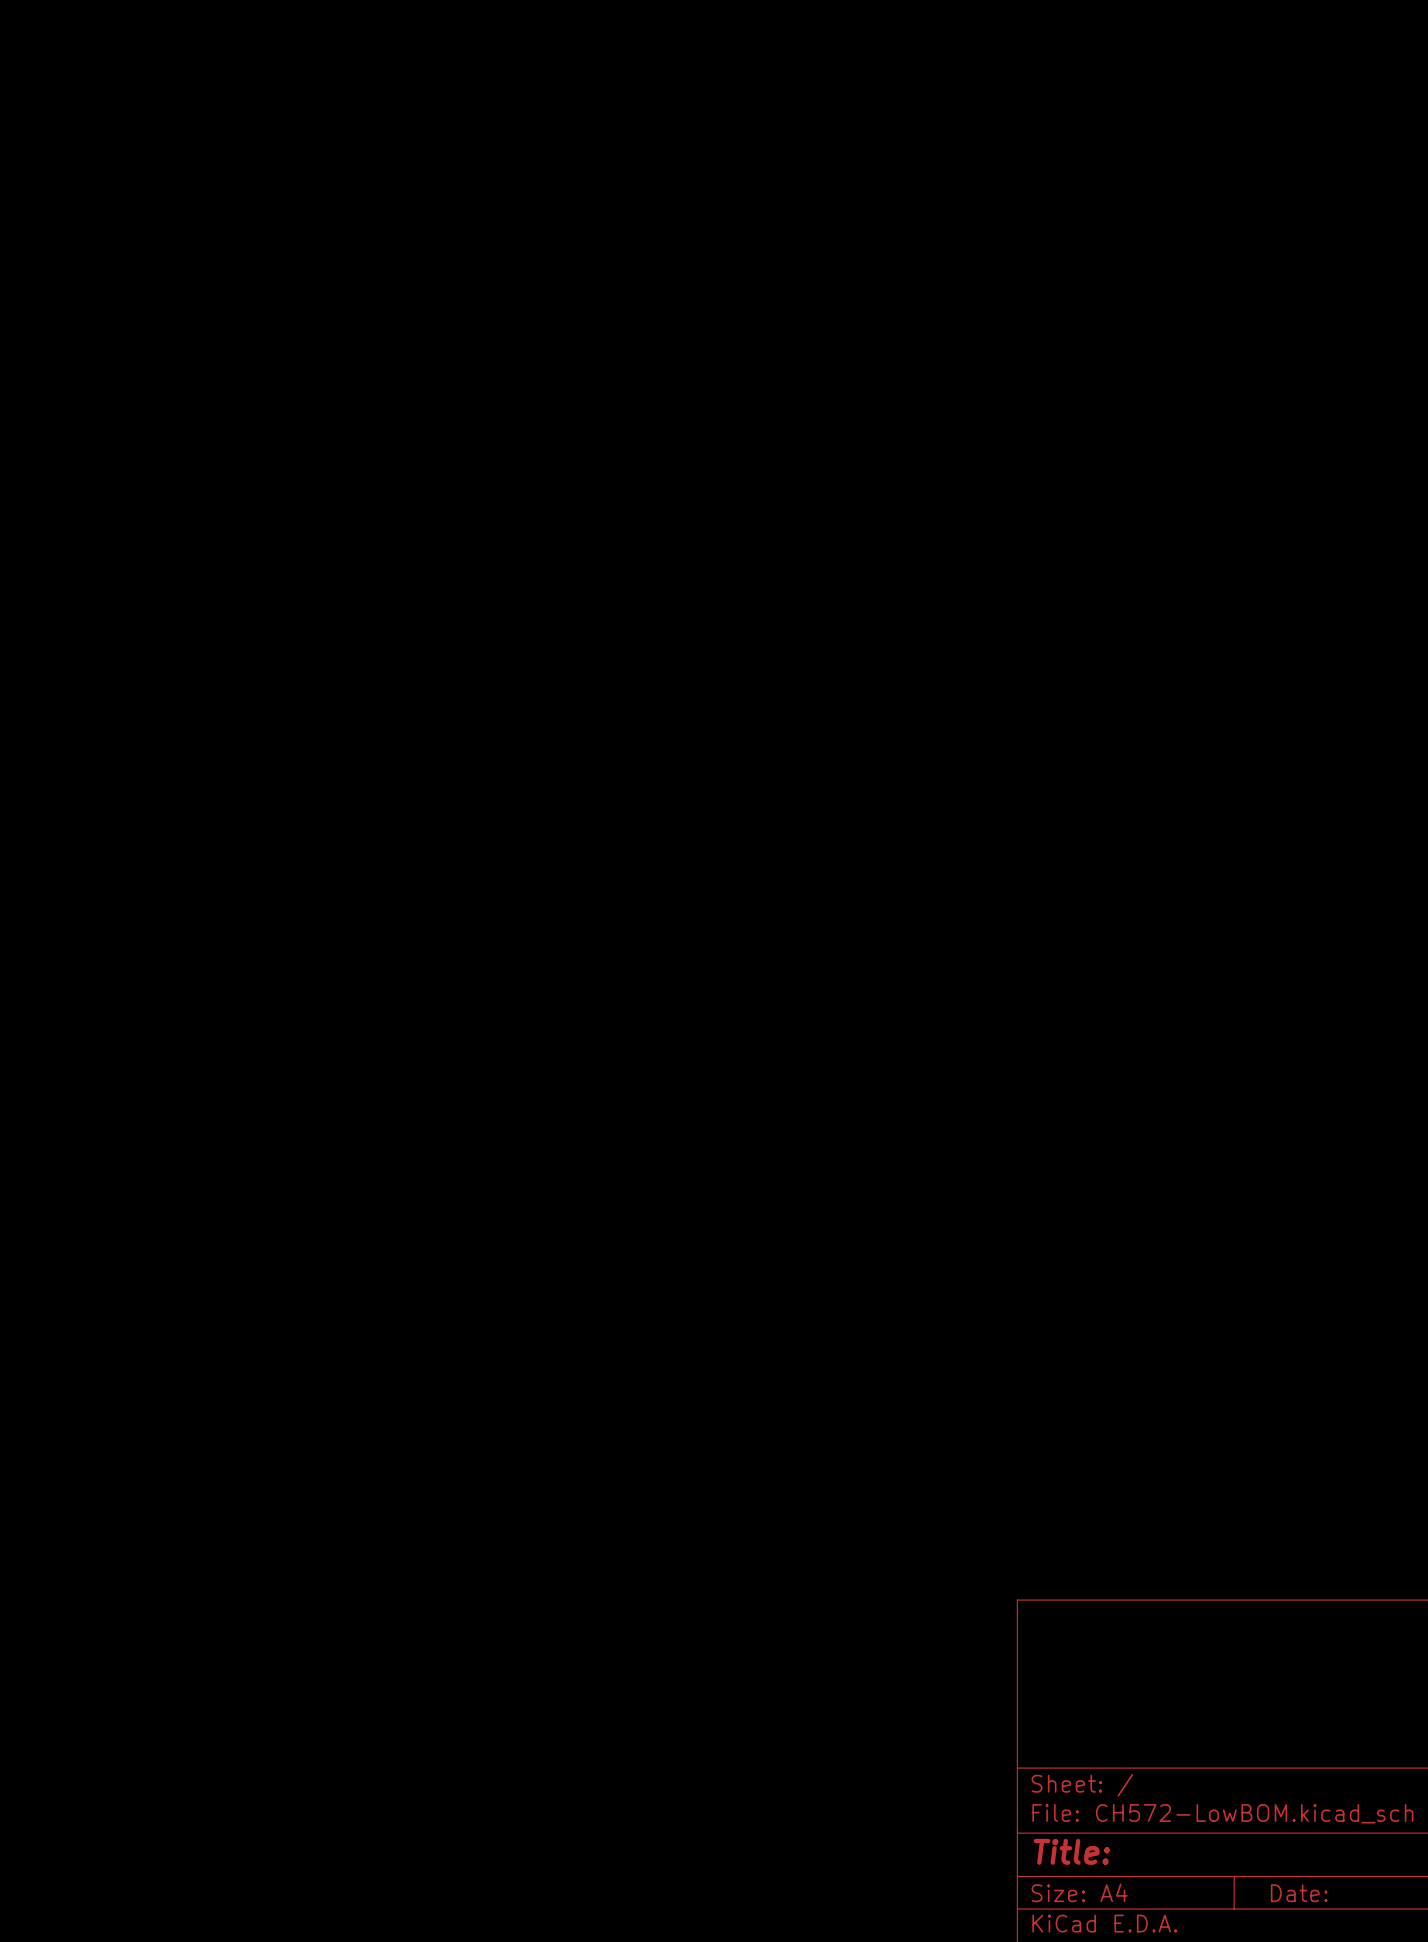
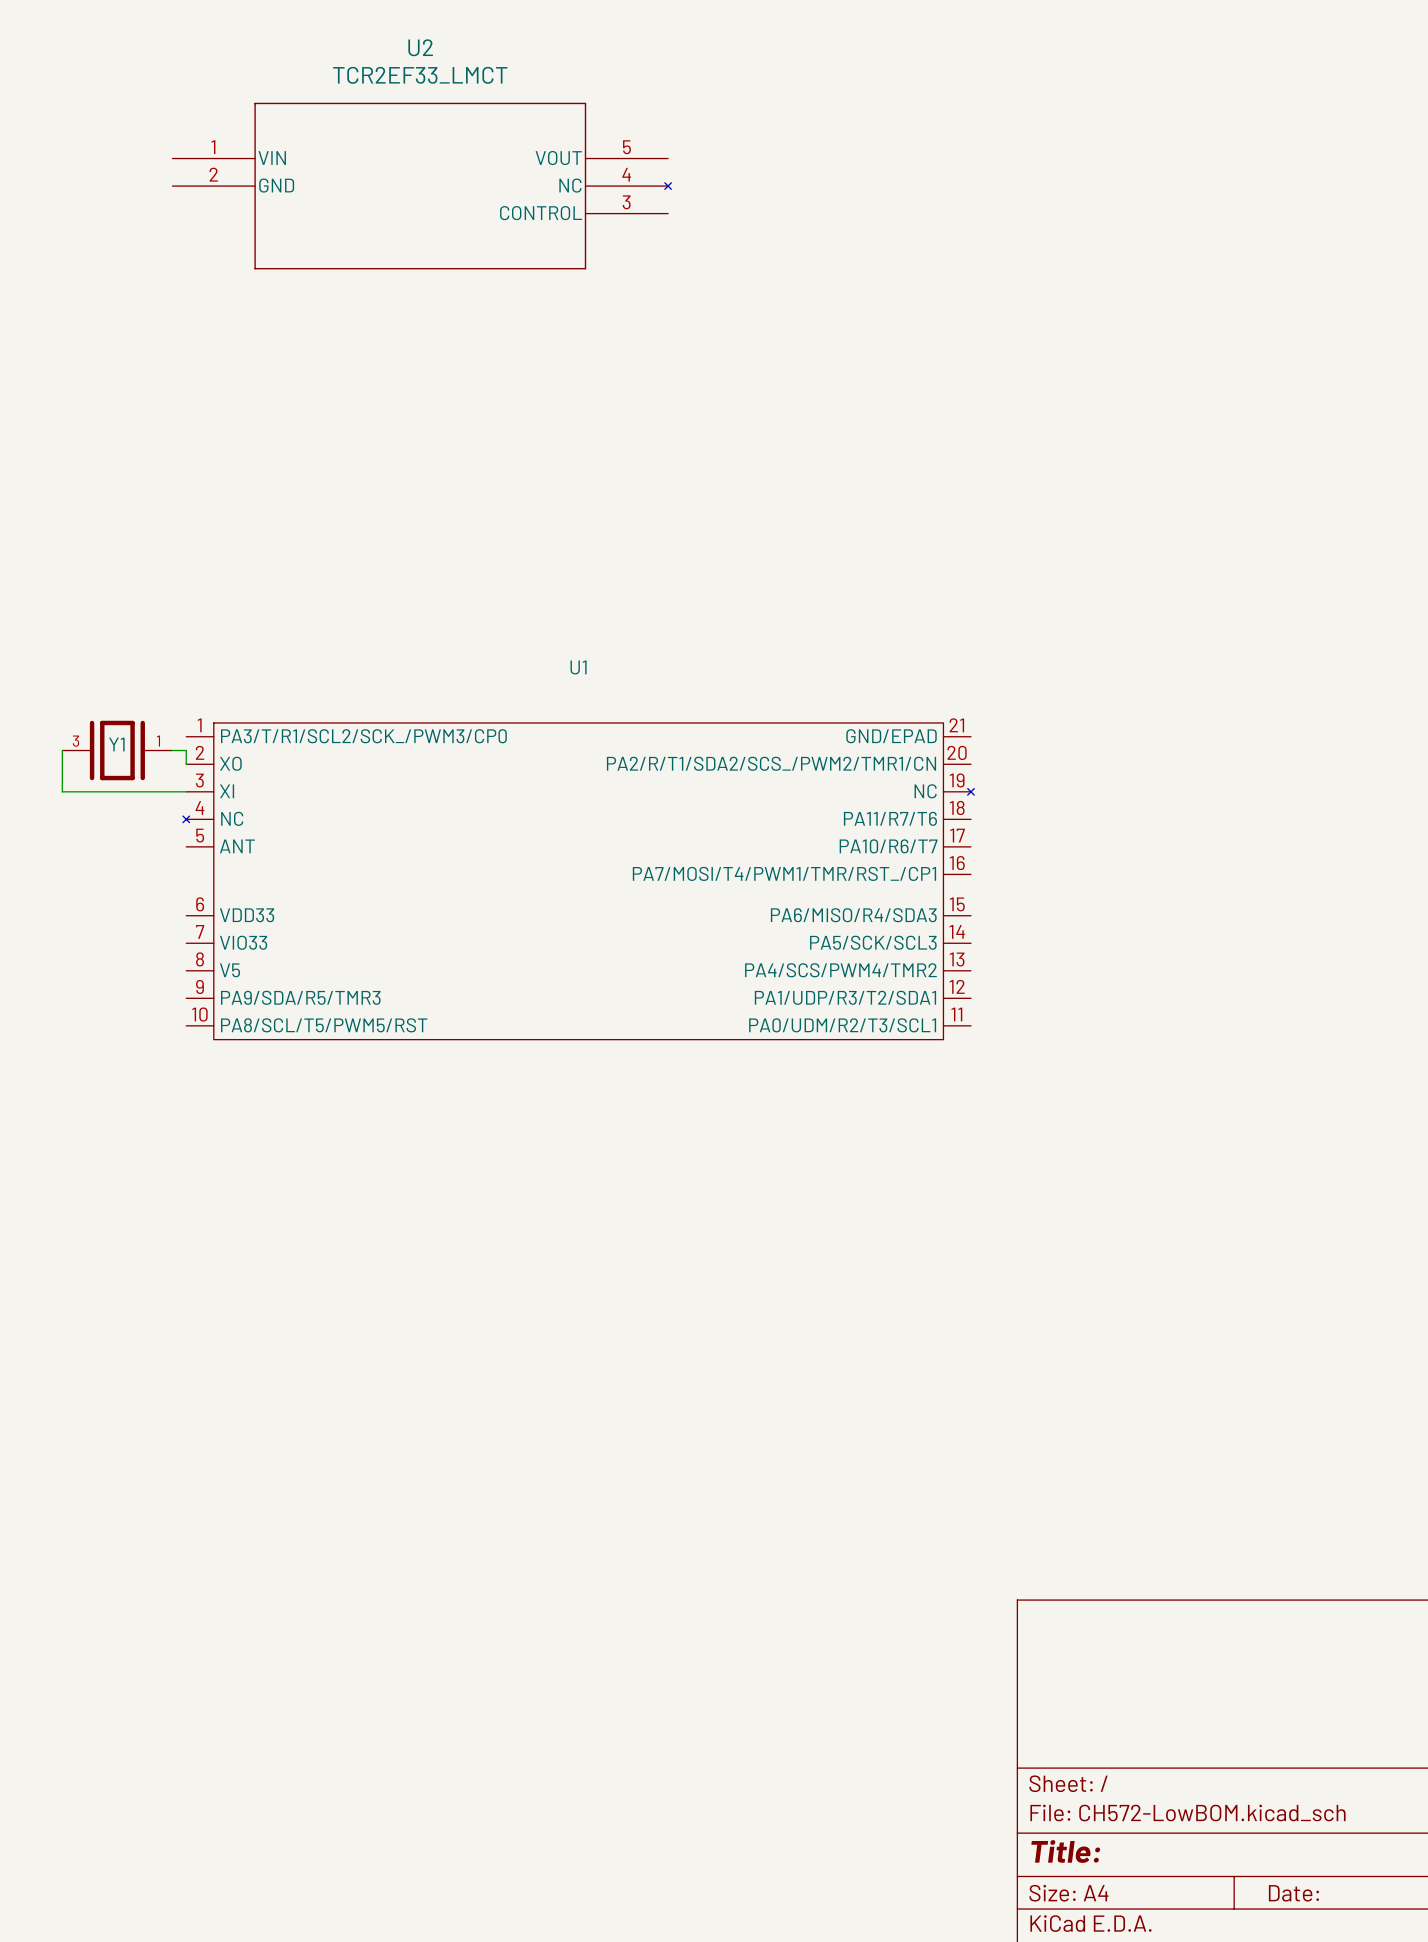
U2: none -> TCR2EF33_LMCT (421, 186)
wire: none -> (62, 750) (62, 791) (186, 791)
Y1: none -> (117, 750)
wire: none -> (172, 750) (186, 750) (186, 764)
U1: none -> (578, 881)

